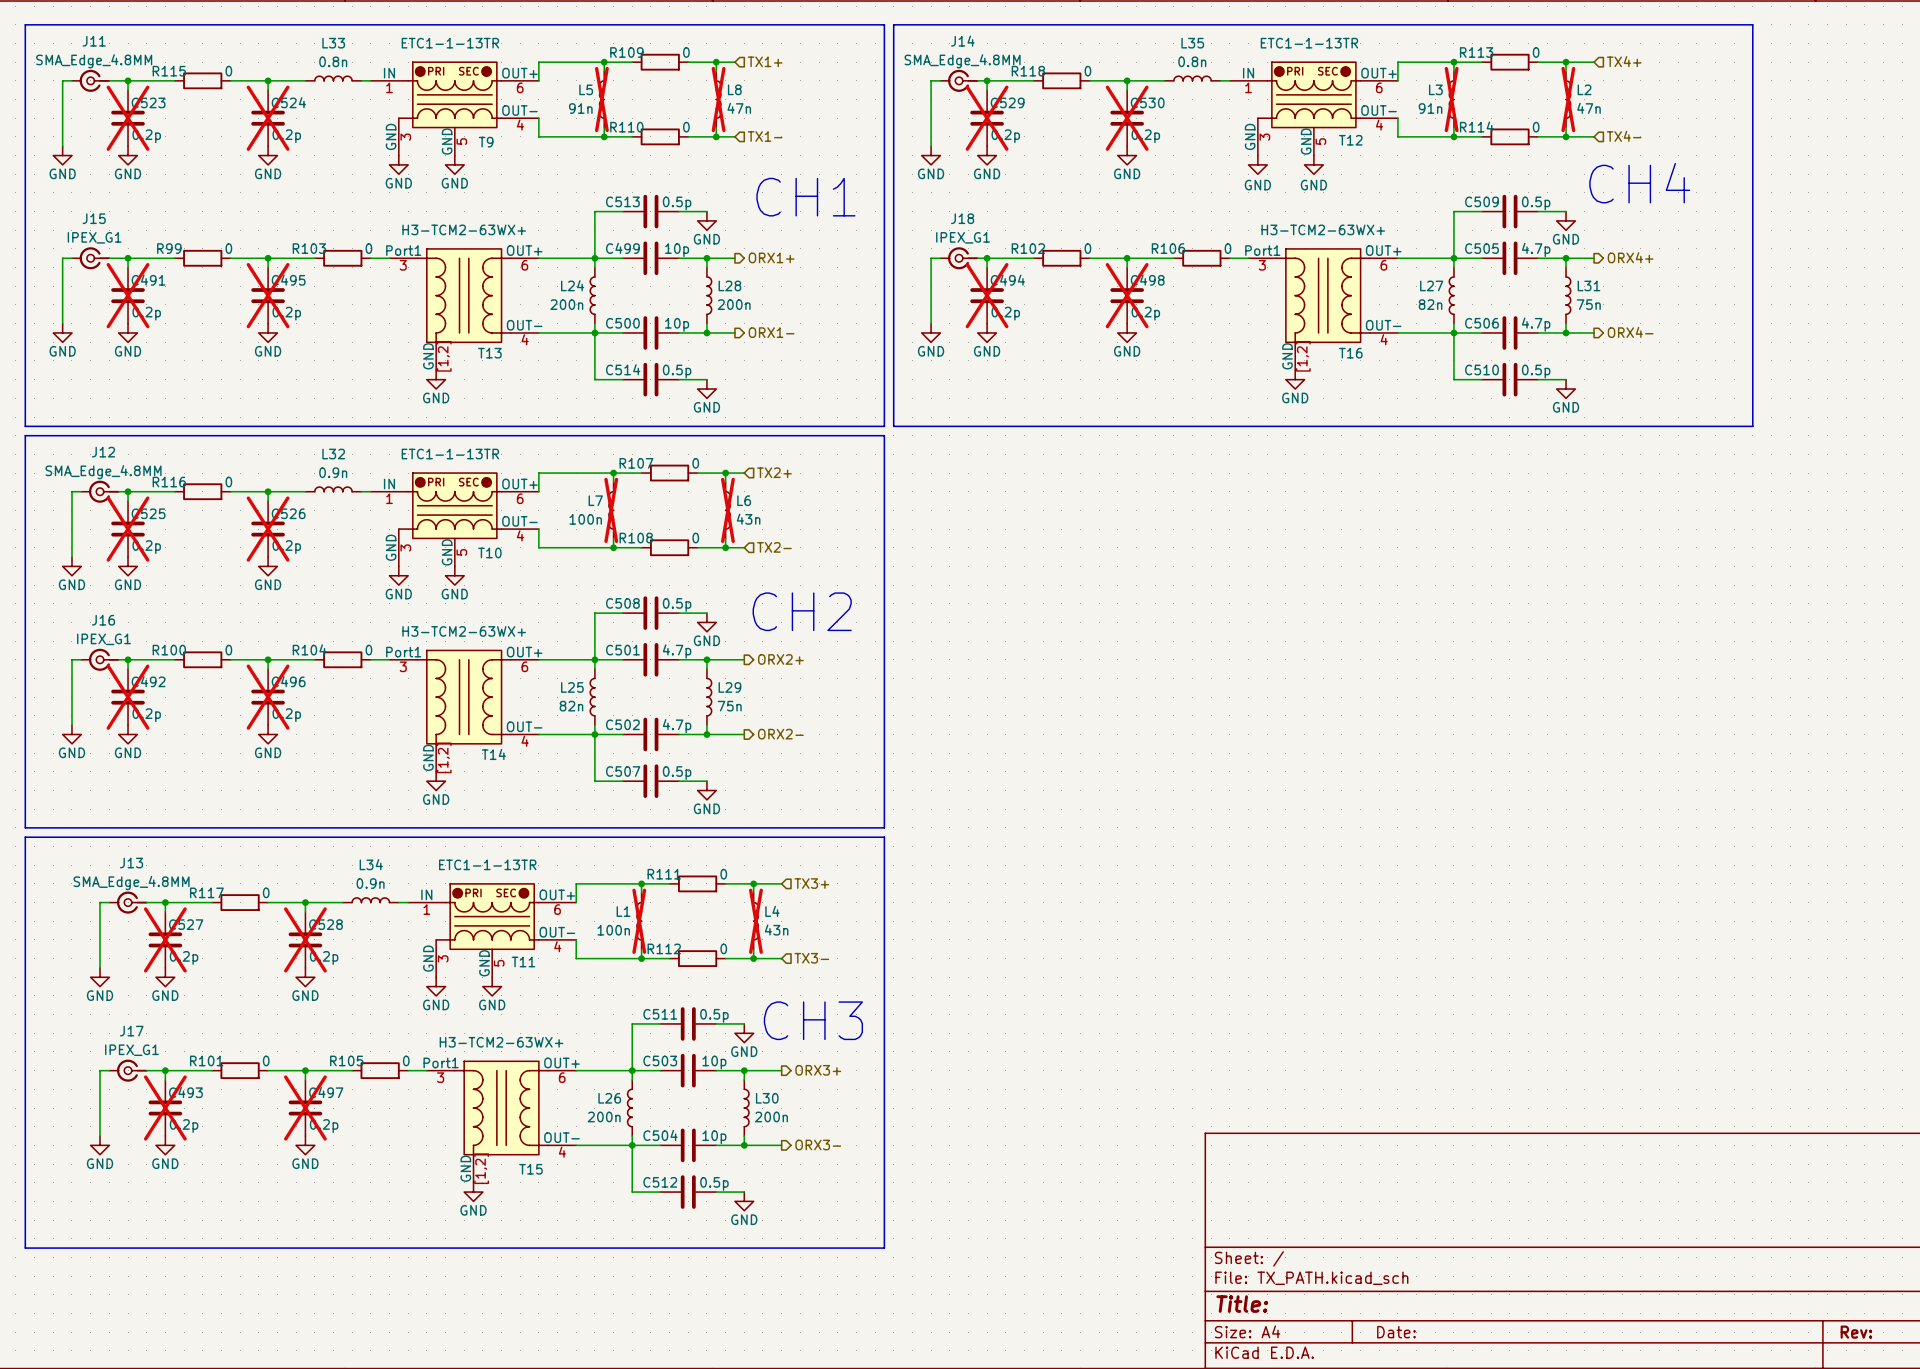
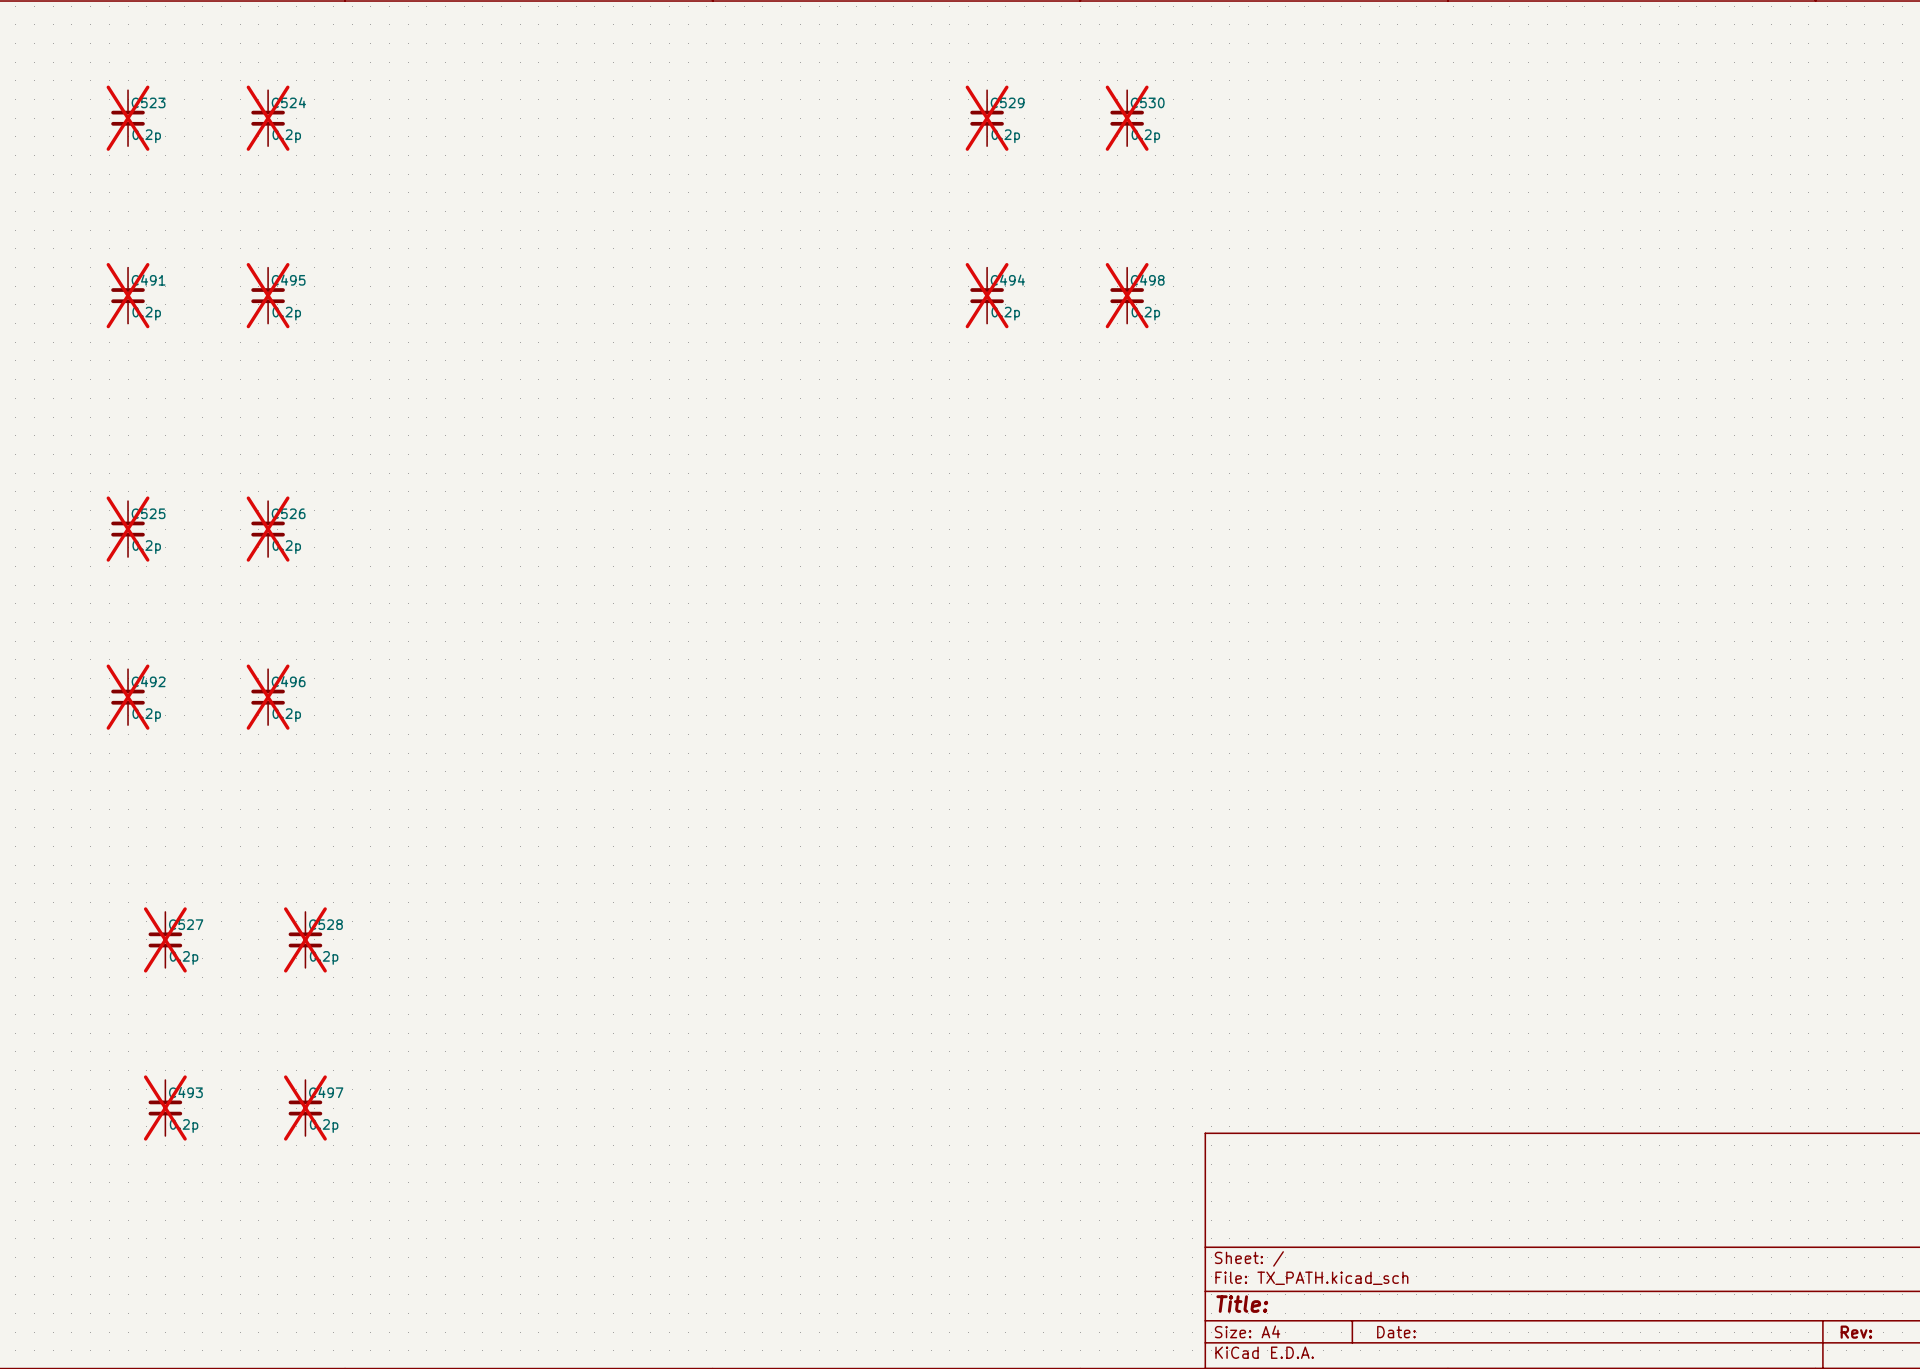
line: (25, 24) (884, 24) (884, 426) (25, 426) (25, 24) -> none
line: (893, 24) (1752, 24) (1752, 426) (893, 426) (893, 24) -> none
hierarchical label: TX1+ (765, 61) -> none
hierarchical label: TX4+ (1624, 61) -> none
wire: (604, 62) (604, 71) -> none
junction: (604, 62) -> none
wire: (632, 62) (538, 62) (538, 80) -> none
R109: 0 (660, 62) -> none
wire: (688, 62) (734, 62) -> none
wire: (716, 62) (716, 71) -> none
junction: (716, 62) -> none
wire: (1453, 62) (1453, 71) -> none
junction: (1453, 62) -> none
wire: (1481, 62) (1397, 62) (1397, 80) -> none
R113: 0 (1509, 62) -> none
wire: (1538, 62) (1594, 62) -> none
wire: (1566, 62) (1566, 71) -> none
junction: (1566, 62) -> none
L33: 0.8n (333, 78) -> none
L35: 0.8n (1192, 78) -> none
wire: (71, 80) (62, 80) (62, 146) -> none
J11: SMA_Edge_4.8MM (90, 80) -> none
wire: (109, 80) (174, 80) -> none
wire: (128, 80) (128, 90) -> none
junction: (128, 80) -> none
R115: 0 (202, 80) -> none
wire: (230, 80) (305, 80) -> none
wire: (268, 80) (268, 90) -> none
junction: (268, 80) -> none
wire: (361, 80) (370, 80) -> none
wire: (940, 80) (931, 80) (931, 146) -> none
J14: SMA_Edge_4.8MM (959, 80) -> none
wire: (977, 80) (1033, 80) -> none
wire: (987, 80) (987, 90) -> none
junction: (987, 80) -> none
R118: 0 (1061, 80) -> none
wire: (1089, 80) (1164, 80) -> none
wire: (1127, 80) (1127, 90) -> none
junction: (1127, 80) -> none
wire: (1220, 80) (1229, 80) -> none
L5: 91n (601, 99) -> none
L8: 47n (718, 99) -> none
L3: 91n (1451, 99) -> none
L2: 47n (1568, 99) -> none
T9: ETC1-1-13TR (454, 108) -> none
T12: ETC1-1-13TR (1313, 108) -> none
wire: (538, 118) (538, 136) (632, 136) -> none
wire: (1397, 118) (1397, 136) (1481, 136) -> none
wire: (604, 127) (604, 136) -> none
wire: (716, 127) (716, 136) -> none
wire: (1453, 127) (1453, 136) -> none
wire: (1566, 127) (1566, 136) -> none
junction: (604, 136) -> none
R110: 0 (660, 136) -> none
wire: (688, 136) (734, 136) -> none
junction: (716, 136) -> none
hierarchical label: TX1- (765, 136) -> none
junction: (1453, 136) -> none
R114: 0 (1509, 136) -> none
wire: (1538, 136) (1594, 136) -> none
junction: (1566, 136) -> none
hierarchical label: TX4- (1624, 136) -> none
power symbol: GND (62, 155) -> none
power symbol: GND (128, 155) -> none
power symbol: GND (268, 155) -> none
power symbol: GND (931, 155) -> none
power symbol: GND (987, 155) -> none
power symbol: GND (1127, 155) -> none
power symbol: GND (398, 164) -> none
power symbol: GND (454, 164) -> none
power symbol: GND (1257, 164) -> none
power symbol: GND (1313, 164) -> none
text: CH4 (1639, 183) -> none
text: CH1 (805, 197) -> none
wire: (622, 211) (594, 211) (594, 267) -> none
C513: 0.5p (650, 211) -> none
wire: (678, 211) (706, 211) -> none
wire: (1481, 211) (1453, 211) (1453, 267) -> none
C509: 0.5p (1509, 211) -> none
wire: (1538, 211) (1566, 211) -> none
power symbol: GND (706, 220) -> none
power symbol: GND (1566, 220) -> none
hierarchical label: ORX1+ (771, 257) -> none
hierarchical label: ORX4+ (1630, 257) -> none
wire: (71, 258) (62, 258) (62, 323) -> none
J15: IPEX_G1 (90, 258) -> none
wire: (109, 258) (174, 258) -> none
wire: (128, 258) (128, 267) -> none
junction: (128, 258) -> none
R99: 0 (202, 258) -> none
wire: (230, 258) (314, 258) -> none
wire: (268, 258) (268, 267) -> none
junction: (268, 258) -> none
R103: 0 (342, 258) -> none
wire: (370, 258) (389, 258) -> none
wire: (538, 258) (622, 258) -> none
junction: (594, 258) -> none
C499: 10p (650, 258) -> none
wire: (678, 258) (734, 258) -> none
wire: (706, 258) (706, 267) -> none
junction: (706, 258) -> none
wire: (940, 258) (931, 258) (931, 323) -> none
J18: IPEX_G1 (959, 258) -> none
wire: (977, 258) (1033, 258) -> none
wire: (987, 258) (987, 267) -> none
junction: (987, 258) -> none
R102: 0 (1061, 258) -> none
wire: (1089, 258) (1173, 258) -> none
wire: (1127, 258) (1127, 267) -> none
junction: (1127, 258) -> none
R106: 0 (1201, 258) -> none
wire: (1229, 258) (1248, 258) -> none
wire: (1397, 258) (1481, 258) -> none
junction: (1453, 258) -> none
C505: 4.7p (1509, 258) -> none
wire: (1538, 258) (1594, 258) -> none
wire: (1566, 258) (1566, 267) -> none
junction: (1566, 258) -> none
L24: 200n (592, 295) -> none
L28: 200n (709, 295) -> none
L27: 82n (1451, 295) -> none
L31: 75n (1568, 295) -> none
T13: H3-TCM2-63WX+ (464, 309) -> none
T16: H3-TCM2-63WX+ (1323, 309) -> none
wire: (594, 323) (594, 379) (622, 379) -> none
wire: (706, 323) (706, 332) -> none
wire: (1453, 323) (1453, 379) (1481, 379) -> none
wire: (1566, 323) (1566, 332) -> none
power symbol: GND (62, 332) -> none
power symbol: GND (128, 332) -> none
power symbol: GND (268, 332) -> none
wire: (538, 332) (622, 332) -> none
junction: (594, 332) -> none
C500: 10p (650, 332) -> none
wire: (678, 332) (734, 332) -> none
junction: (706, 332) -> none
hierarchical label: ORX1- (771, 332) -> none
power symbol: GND (931, 332) -> none
power symbol: GND (987, 332) -> none
power symbol: GND (1127, 332) -> none
wire: (1397, 332) (1481, 332) -> none
junction: (1453, 332) -> none
C506: 4.7p (1509, 332) -> none
wire: (1538, 332) (1594, 332) -> none
junction: (1566, 332) -> none
hierarchical label: ORX4- (1630, 332) -> none
power symbol: GND (436, 379) -> none
C514: 0.5p (650, 379) -> none
wire: (678, 379) (706, 379) -> none
power symbol: GND (1295, 379) -> none
C510: 0.5p (1509, 379) -> none
wire: (1538, 379) (1566, 379) -> none
power symbol: GND (706, 389) -> none
power symbol: GND (1566, 389) -> none
line: (25, 435) (25, 827) (884, 827) (884, 435) (25, 435) -> none
hierarchical label: TX2+ (774, 472) -> none
wire: (613, 473) (613, 482) -> none
junction: (613, 473) -> none
wire: (641, 473) (538, 473) (538, 491) -> none
R107: 0 (669, 473) -> none
wire: (697, 473) (744, 473) -> none
wire: (725, 473) (725, 482) -> none
junction: (725, 473) -> none
L32: 0.9n (333, 489) -> none
wire: (81, 491) (71, 491) (71, 557) -> none
J12: SMA_Edge_4.8MM (100, 491) -> none
wire: (118, 491) (174, 491) -> none
wire: (128, 491) (128, 501) -> none
junction: (128, 491) -> none
R116: 0 (202, 491) -> none
wire: (230, 491) (305, 491) -> none
wire: (268, 491) (268, 501) -> none
junction: (268, 491) -> none
wire: (361, 491) (370, 491) -> none
L7: 100n (611, 510) -> none
L6: 43n (727, 510) -> none
T10: ETC1-1-13TR (454, 519) -> none
wire: (538, 529) (538, 547) (641, 547) -> none
wire: (613, 538) (613, 547) -> none
wire: (725, 538) (725, 547) -> none
junction: (613, 547) -> none
R108: 0 (669, 547) -> none
wire: (697, 547) (744, 547) -> none
junction: (725, 547) -> none
hierarchical label: TX2- (774, 547) -> none
power symbol: GND (71, 566) -> none
power symbol: GND (128, 566) -> none
power symbol: GND (268, 566) -> none
power symbol: GND (398, 575) -> none
power symbol: GND (454, 575) -> none
text: CH2 (802, 611) -> none
wire: (622, 613) (594, 613) (594, 669) -> none
C508: 0.5p (650, 613) -> none
wire: (678, 613) (706, 613) -> none
power symbol: GND (706, 622) -> none
wire: (81, 659) (71, 659) (71, 725) -> none
J16: IPEX_G1 (100, 659) -> none
wire: (118, 659) (174, 659) -> none
wire: (128, 659) (128, 669) -> none
junction: (128, 659) -> none
R100: 0 (202, 659) -> none
wire: (230, 659) (314, 659) -> none
wire: (268, 659) (268, 669) -> none
junction: (268, 659) -> none
R104: 0 (342, 659) -> none
wire: (370, 659) (389, 659) -> none
wire: (538, 659) (622, 659) -> none
junction: (594, 659) -> none
C501: 4.7p (650, 659) -> none
wire: (678, 659) (744, 659) -> none
wire: (706, 659) (706, 669) -> none
junction: (706, 659) -> none
hierarchical label: ORX2+ (780, 659) -> none
L25: 82n (592, 697) -> none
L29: 75n (709, 697) -> none
T14: H3-TCM2-63WX+ (464, 711) -> none
wire: (594, 725) (594, 781) (622, 781) -> none
wire: (706, 725) (706, 734) -> none
power symbol: GND (71, 734) -> none
power symbol: GND (128, 734) -> none
power symbol: GND (268, 734) -> none
wire: (538, 734) (622, 734) -> none
junction: (594, 734) -> none
C502: 4.7p (650, 734) -> none
wire: (678, 734) (744, 734) -> none
junction: (706, 734) -> none
hierarchical label: ORX2- (780, 734) -> none
power symbol: GND (436, 781) -> none
C507: 0.5p (650, 781) -> none
wire: (678, 781) (706, 781) -> none
power symbol: GND (706, 790) -> none
line: (25, 837) (25, 1248) (884, 1248) (884, 837) (25, 837) -> none
wire: (641, 883) (641, 893) -> none
junction: (641, 883) -> none
wire: (669, 883) (576, 883) (576, 902) -> none
R111: 0 (697, 883) -> none
wire: (725, 883) (781, 883) -> none
wire: (753, 883) (753, 893) -> none
junction: (753, 883) -> none
hierarchical label: TX3+ (811, 883) -> none
L34: 0.9n (370, 900) -> none
wire: (109, 902) (100, 902) (100, 967) -> none
J13: SMA_Edge_4.8MM (128, 902) -> none
wire: (146, 902) (212, 902) -> none
wire: (165, 902) (165, 911) -> none
junction: (165, 902) -> none
R117: 0 (240, 902) -> none
wire: (268, 902) (342, 902) -> none
wire: (305, 902) (305, 911) -> none
junction: (305, 902) -> none
wire: (398, 902) (408, 902) -> none
L1: 100n (639, 921) -> none
L4: 43n (755, 921) -> none
T11: ETC1-1-13TR (492, 930) -> none
wire: (576, 939) (576, 958) (669, 958) -> none
wire: (641, 949) (641, 958) -> none
wire: (753, 949) (753, 958) -> none
junction: (641, 958) -> none
R112: 0 (697, 958) -> none
wire: (725, 958) (781, 958) -> none
junction: (753, 958) -> none
hierarchical label: TX3- (811, 958) -> none
power symbol: GND (100, 977) -> none
power symbol: GND (165, 977) -> none
power symbol: GND (305, 977) -> none
power symbol: GND (436, 986) -> none
power symbol: GND (492, 986) -> none
text: CH3 (813, 1020) -> none
wire: (660, 1023) (632, 1023) (632, 1079) -> none
C511: 0.5p (688, 1023) -> none
wire: (716, 1023) (744, 1023) -> none
power symbol: GND (744, 1033) -> none
wire: (109, 1070) (100, 1070) (100, 1136) -> none
J17: IPEX_G1 (128, 1070) -> none
wire: (146, 1070) (212, 1070) -> none
wire: (165, 1070) (165, 1079) -> none
junction: (165, 1070) -> none
R101: 0 (240, 1070) -> none
wire: (268, 1070) (352, 1070) -> none
wire: (305, 1070) (305, 1079) -> none
junction: (305, 1070) -> none
R105: 0 (380, 1070) -> none
wire: (408, 1070) (426, 1070) -> none
wire: (576, 1070) (660, 1070) -> none
junction: (632, 1070) -> none
C503: 10p (688, 1070) -> none
wire: (716, 1070) (781, 1070) -> none
wire: (744, 1070) (744, 1079) -> none
junction: (744, 1070) -> none
hierarchical label: ORX3+ (818, 1070) -> none
L26: 200n (629, 1108) -> none
L30: 200n (746, 1108) -> none
T15: H3-TCM2-63WX+ (501, 1122) -> none
wire: (632, 1136) (632, 1192) (660, 1192) -> none
wire: (744, 1136) (744, 1145) -> none
power symbol: GND (100, 1145) -> none
power symbol: GND (165, 1145) -> none
power symbol: GND (305, 1145) -> none
wire: (576, 1145) (660, 1145) -> none
junction: (632, 1145) -> none
C504: 10p (688, 1145) -> none
wire: (716, 1145) (781, 1145) -> none
junction: (744, 1145) -> none
hierarchical label: ORX3- (818, 1145) -> none
power symbol: GND (473, 1192) -> none
C512: 0.5p (688, 1192) -> none
wire: (716, 1192) (744, 1192) -> none
power symbol: GND (744, 1201) -> none

